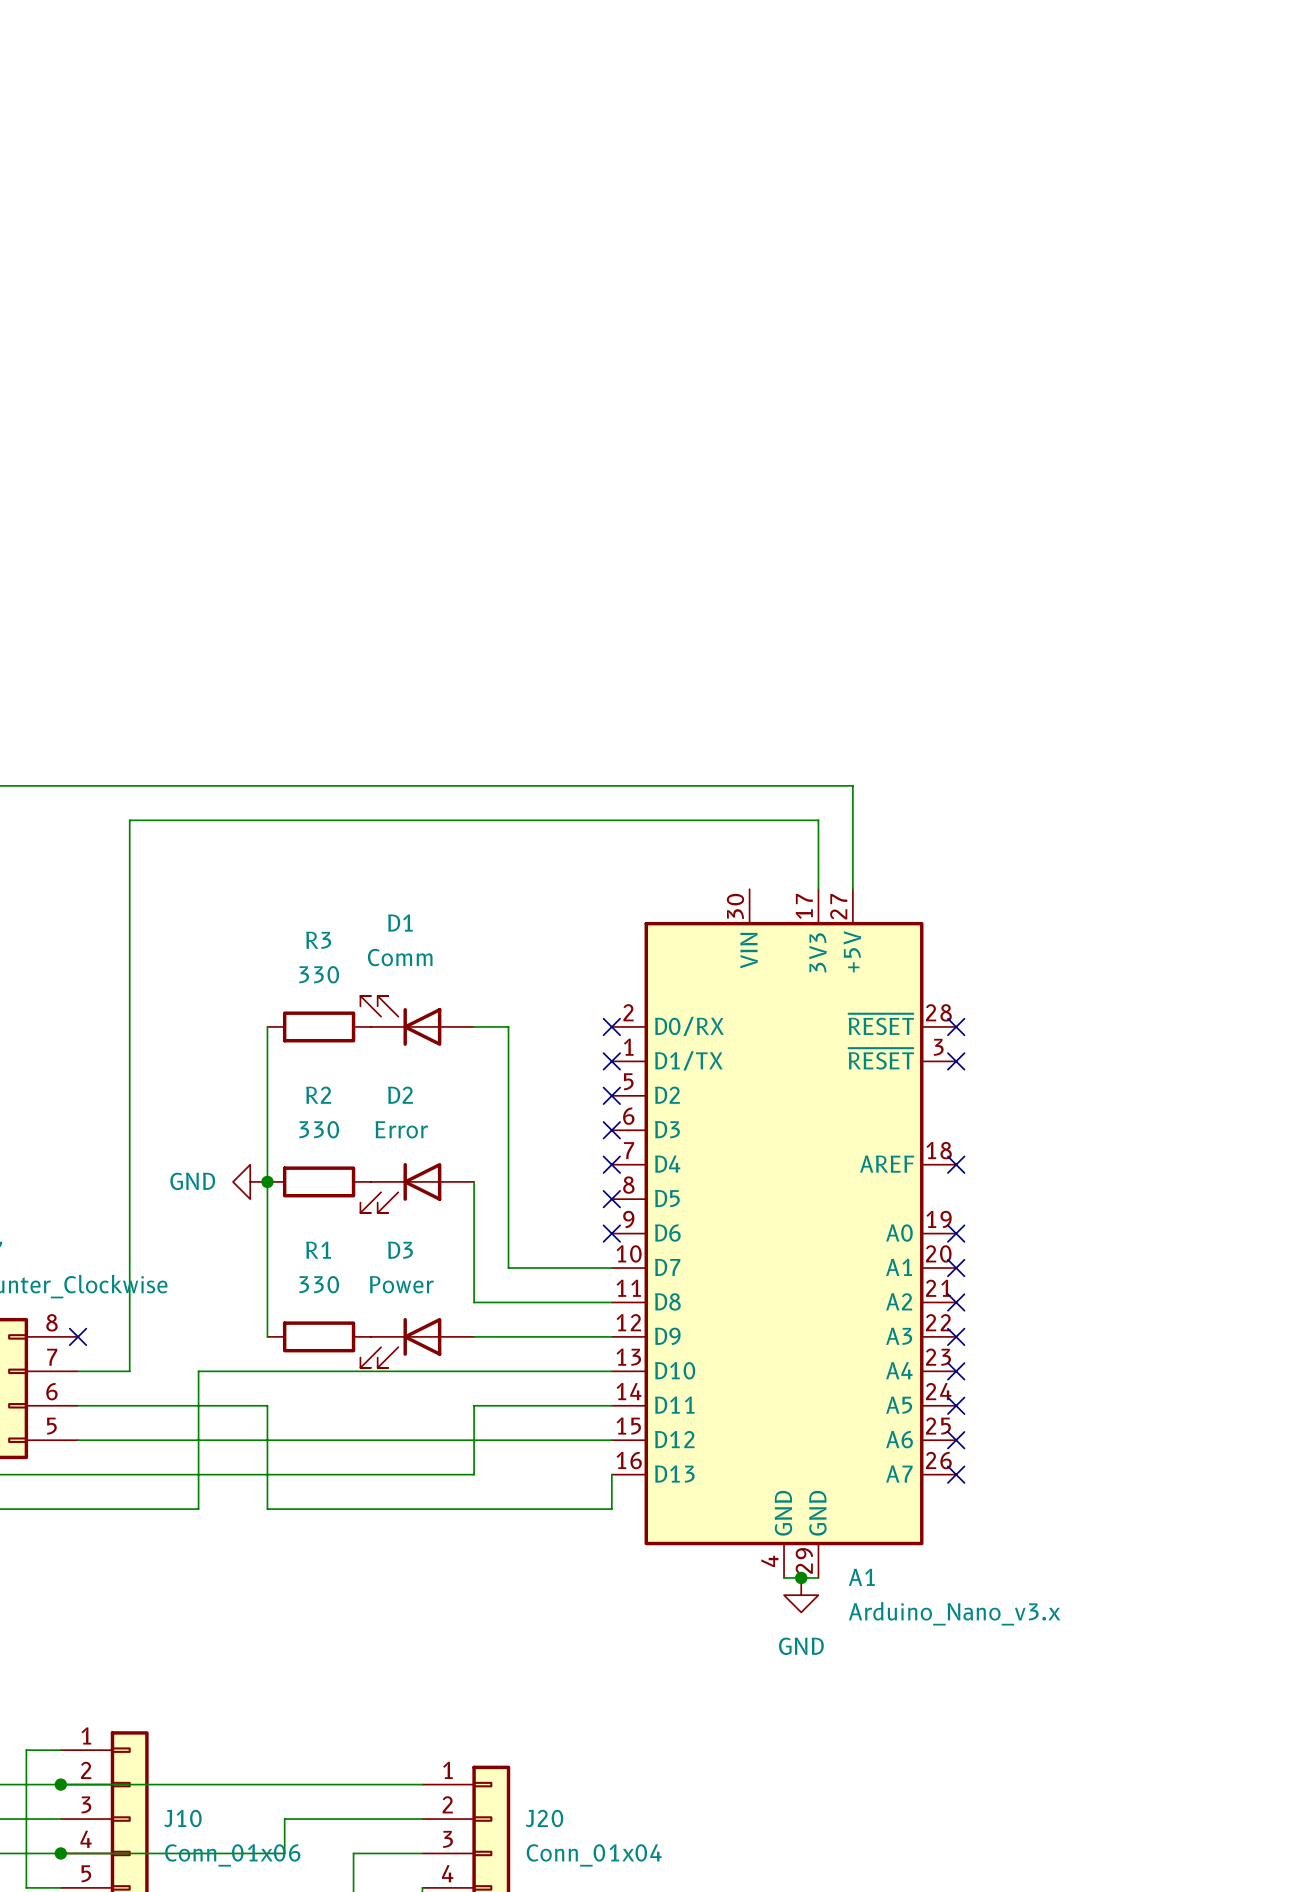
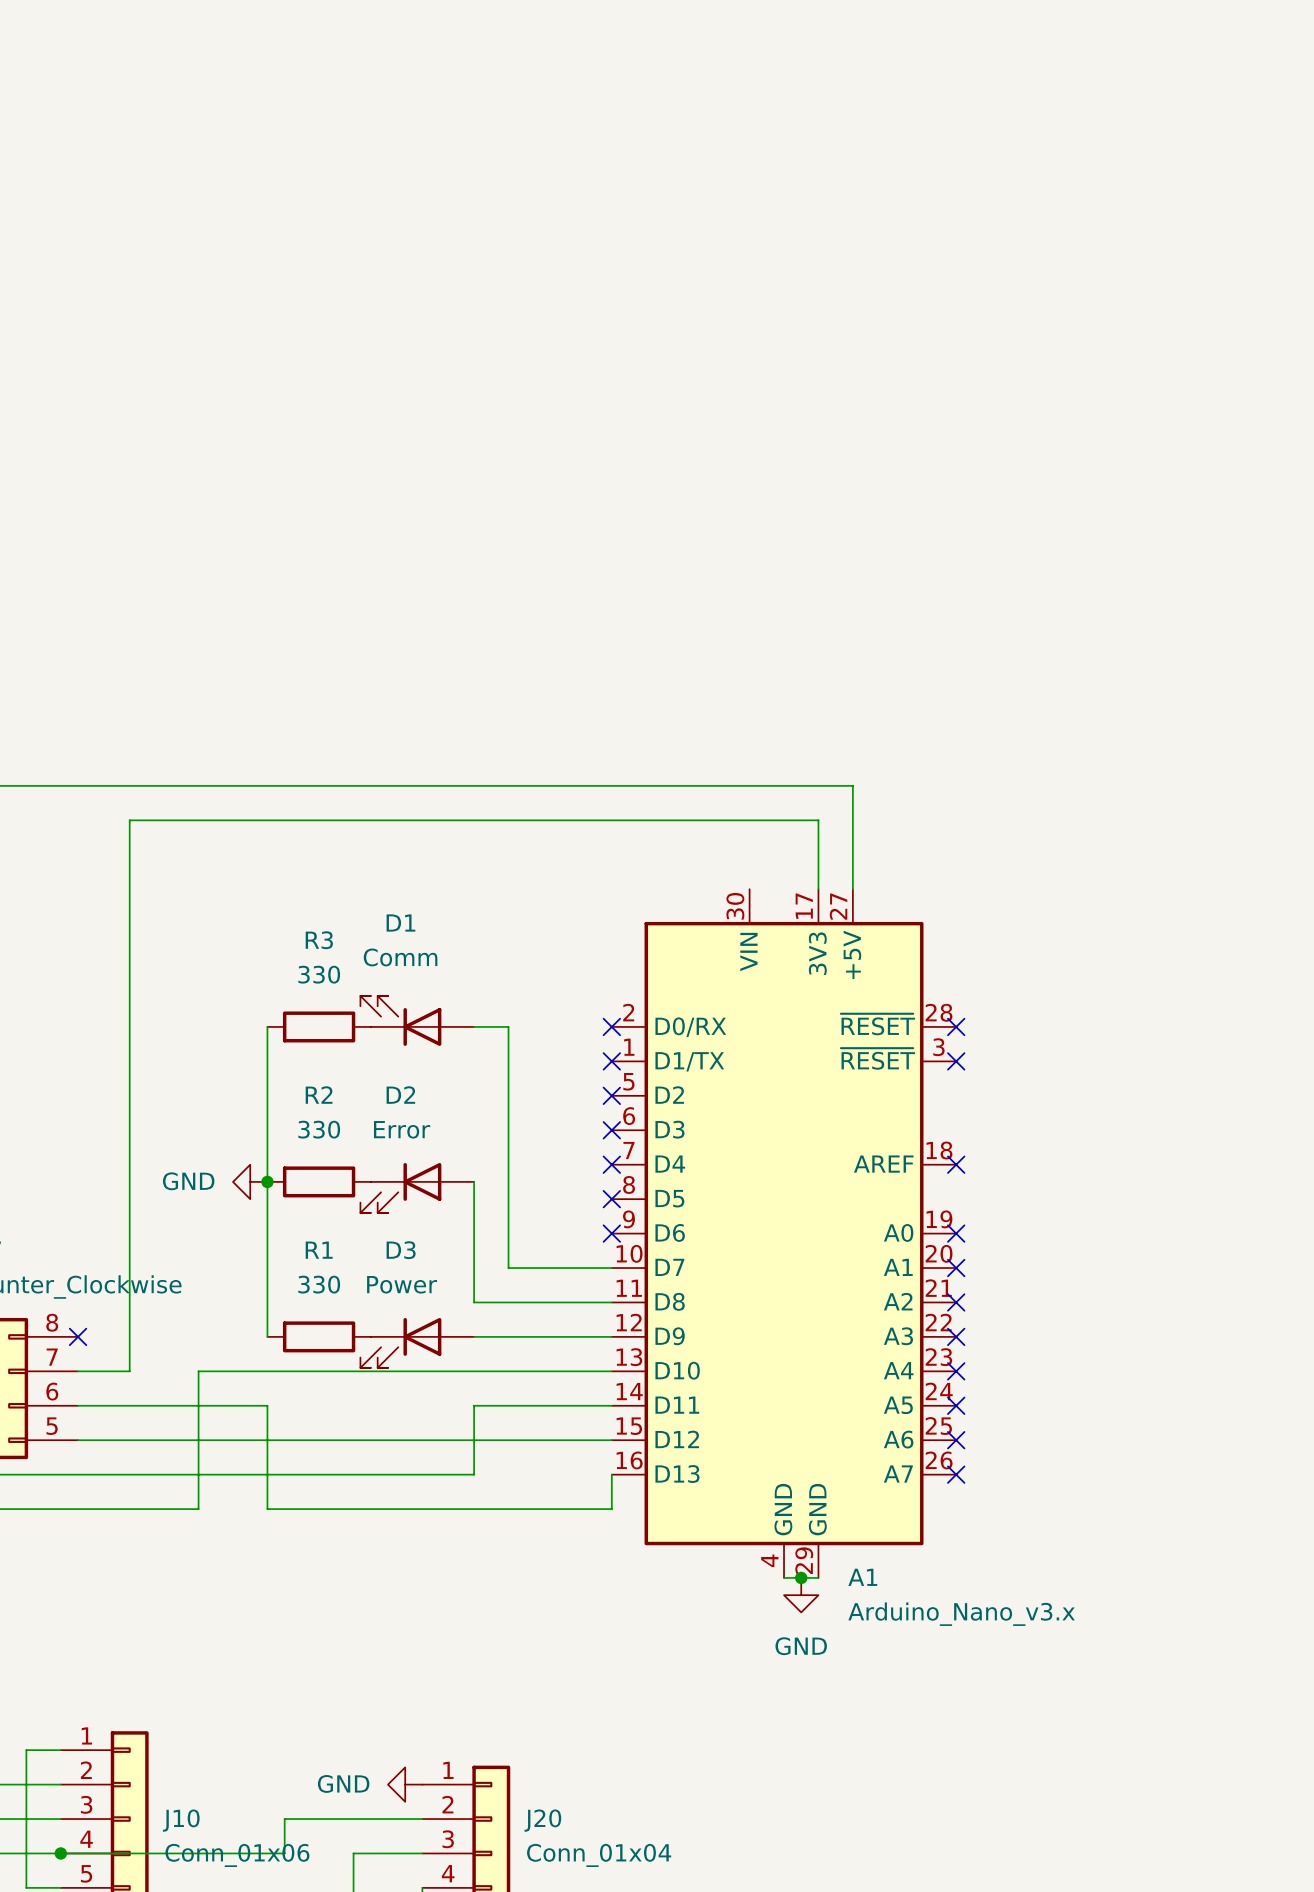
wire: (60, 1784) (422, 1784) -> none
junction: (60, 1784) -> none
power symbol: none -> GND (405, 1784)

